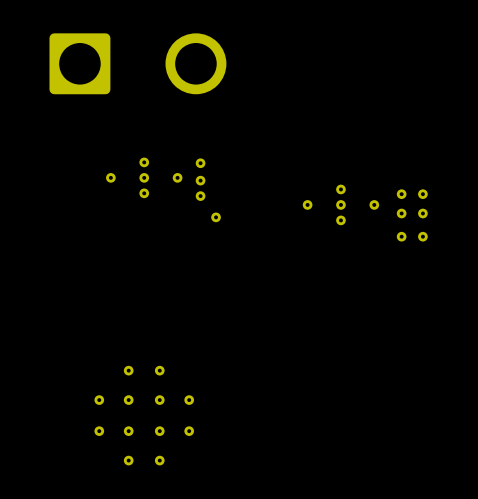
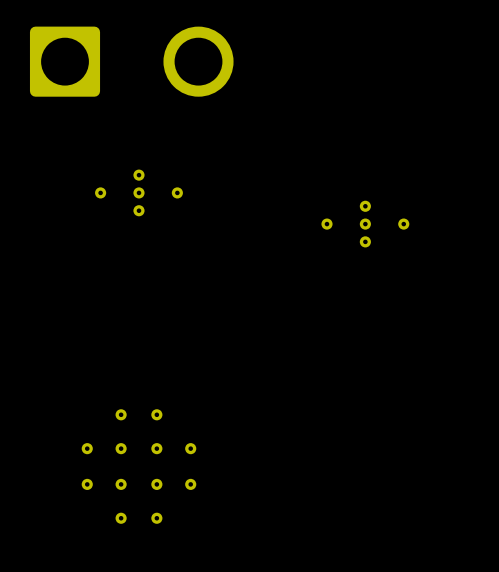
part: (200, 163) -> none
part: (200, 180) -> none
part: (401, 194) -> none
part: (422, 194) -> none
part: (200, 196) -> none
part: (401, 213) -> none
part: (422, 213) -> none
part: (216, 217) -> none
part: (401, 236) -> none
part: (422, 236) -> none

